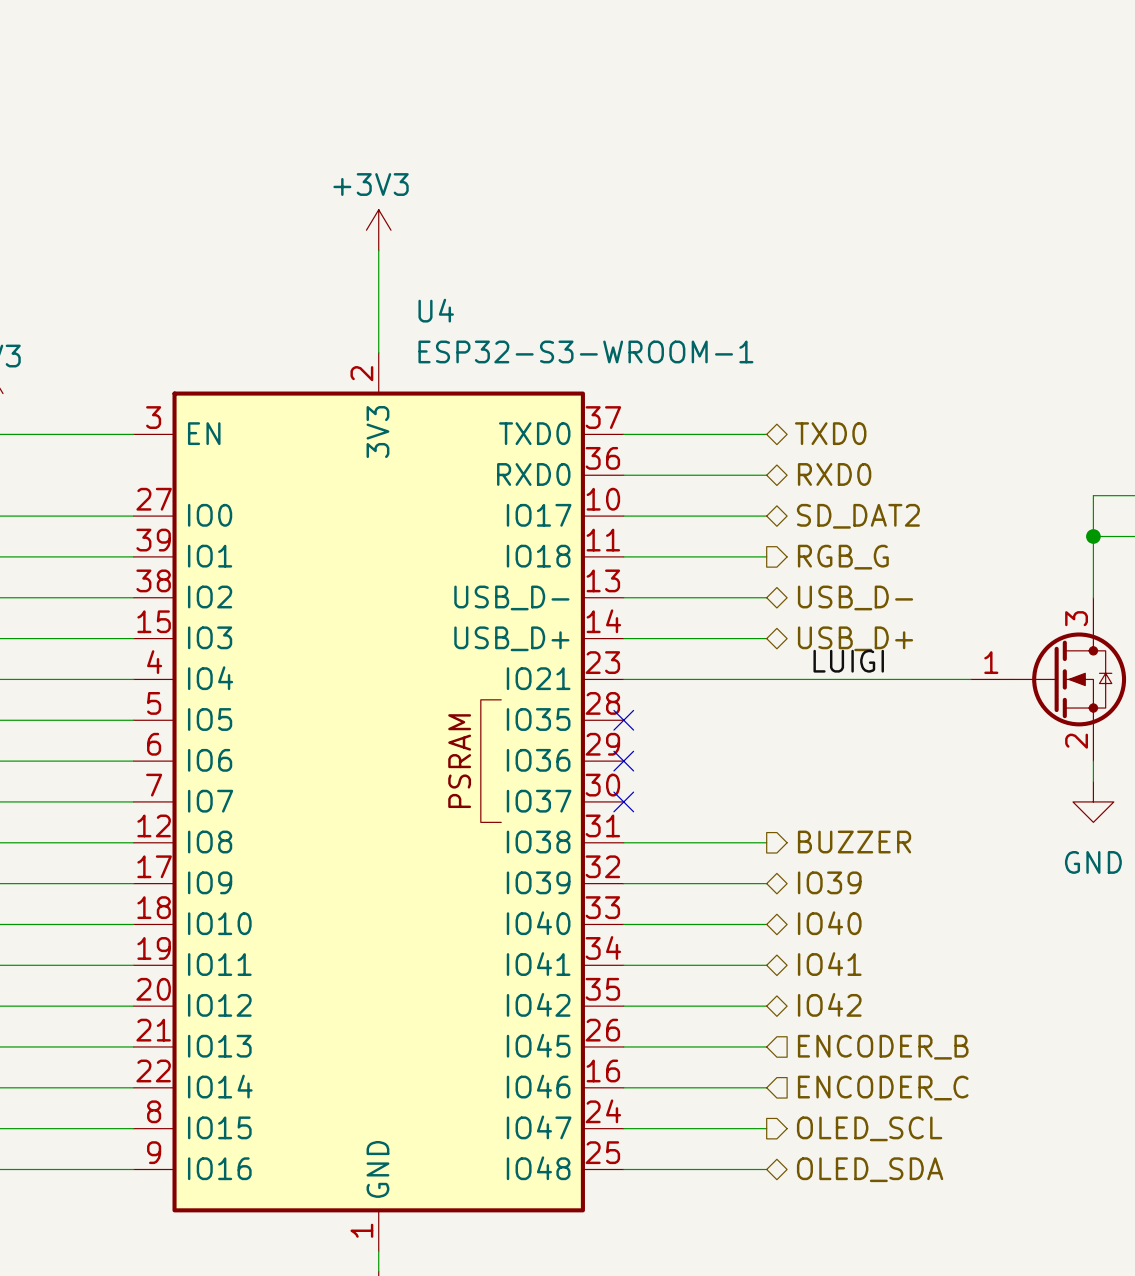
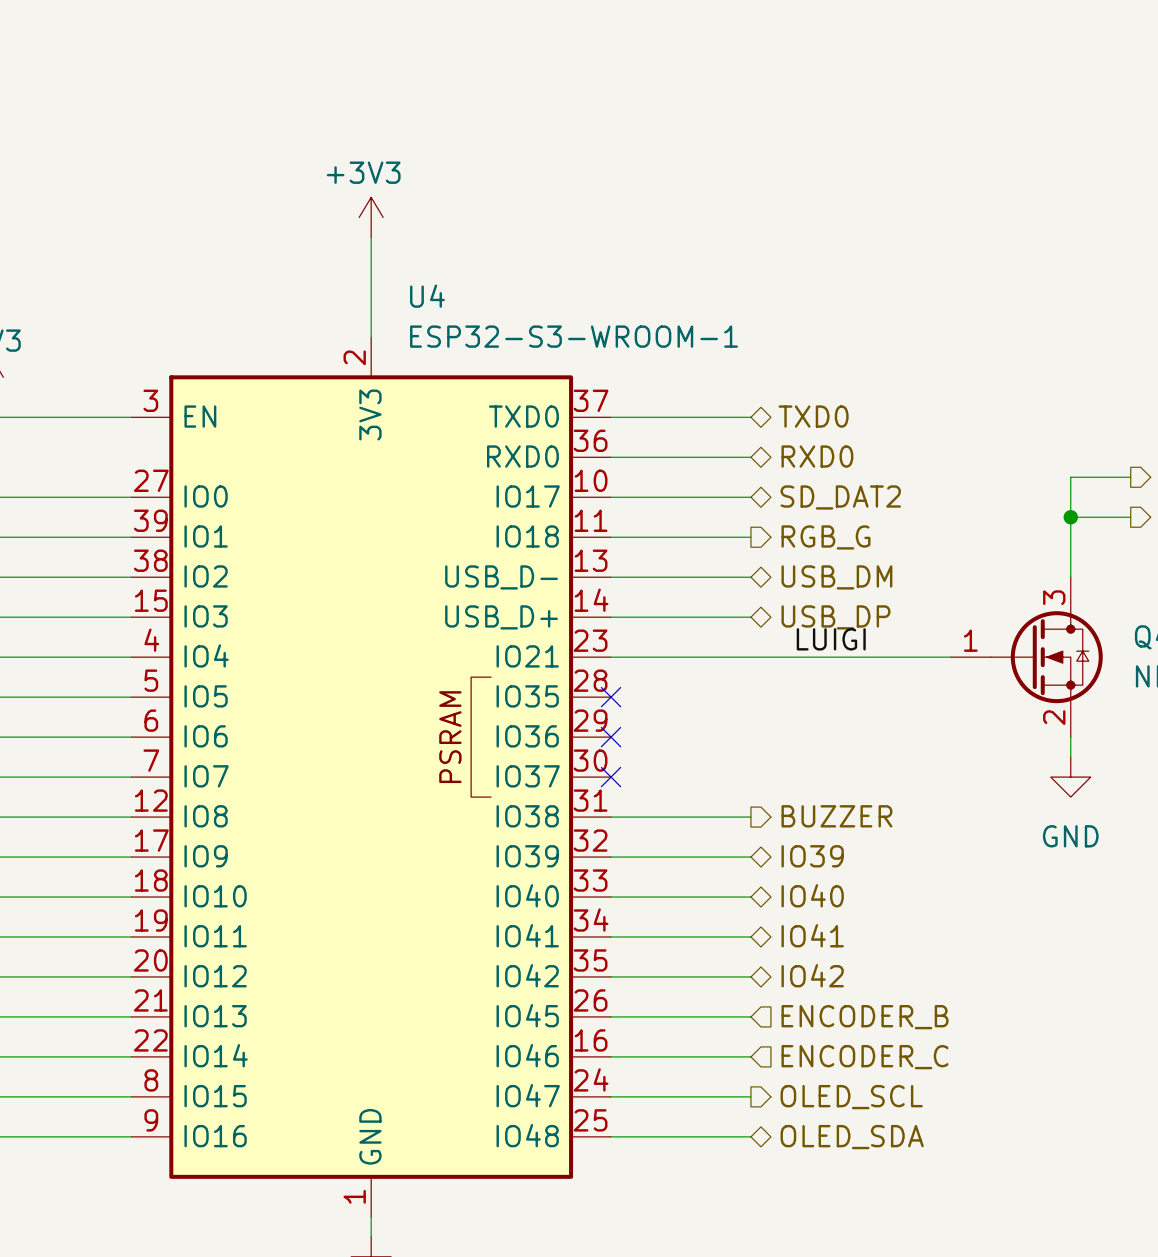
hierarchical label: USB_D- (855, 597) -> USB_DM (836, 577)
hierarchical label: USB_D+ (855, 638) -> USB_DP (835, 617)

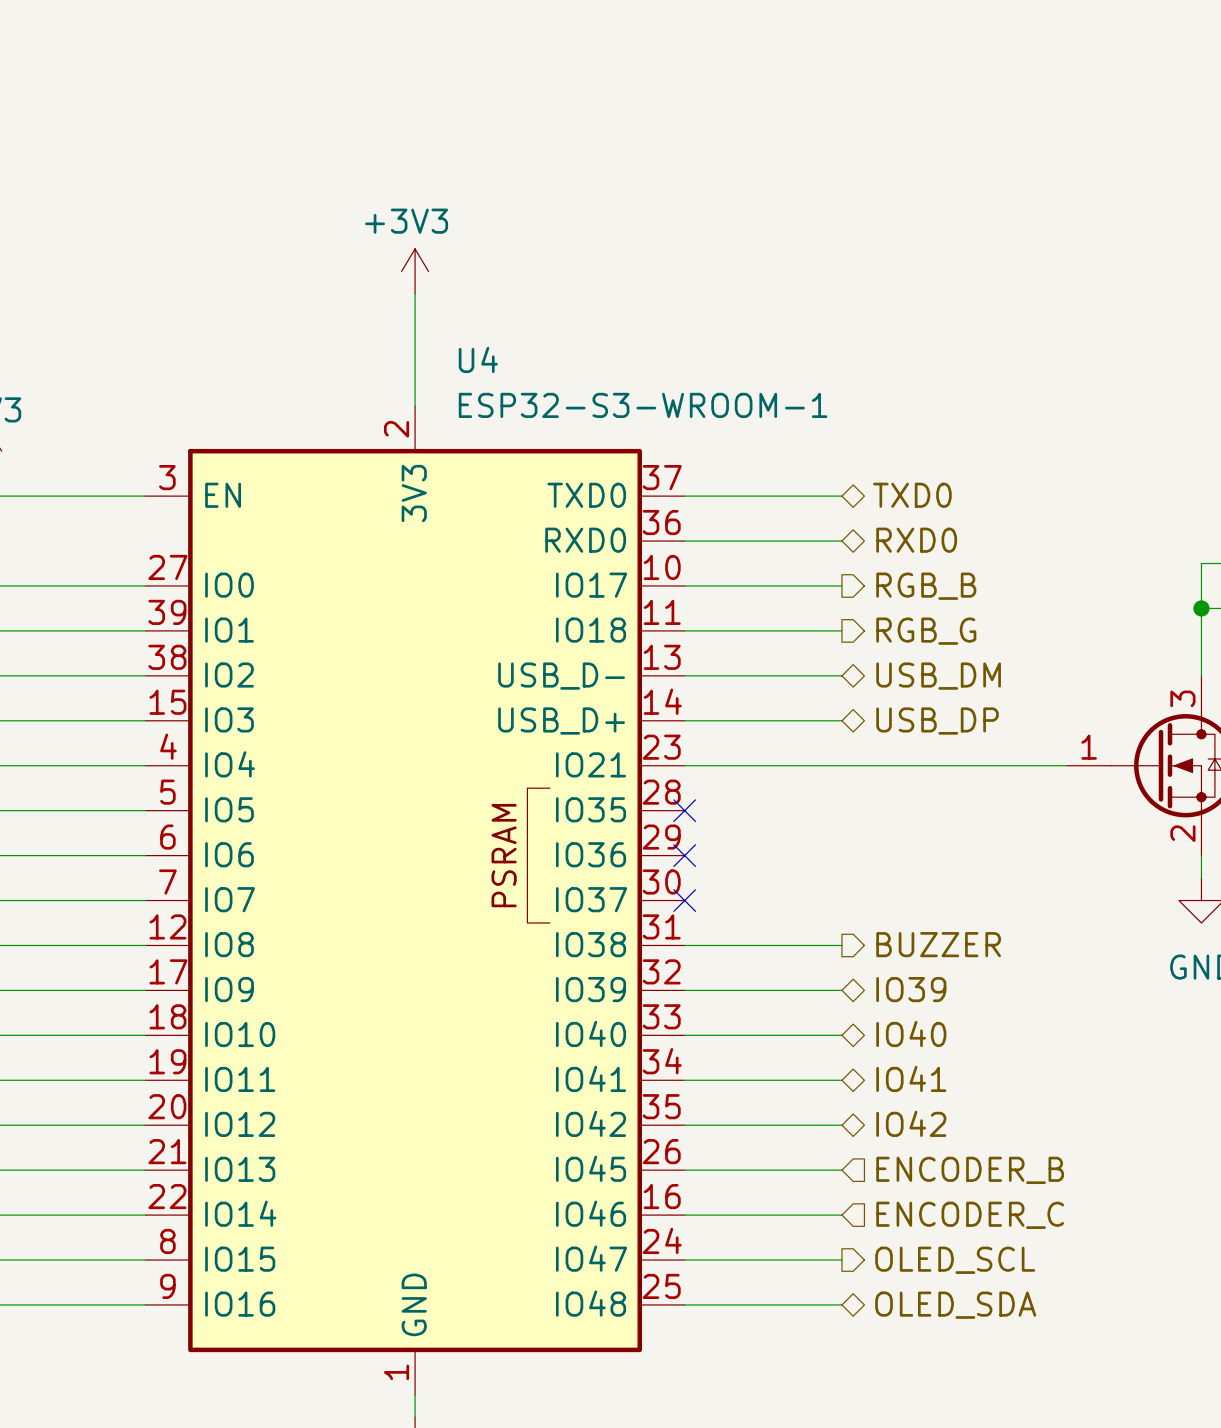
hierarchical label shape: bidirectional (840, 497) -> output (926, 586)
hierarchical label: SD_DAT2 (840, 497) -> RGB_B (926, 586)
label: LUIGI (831, 639) -> none

